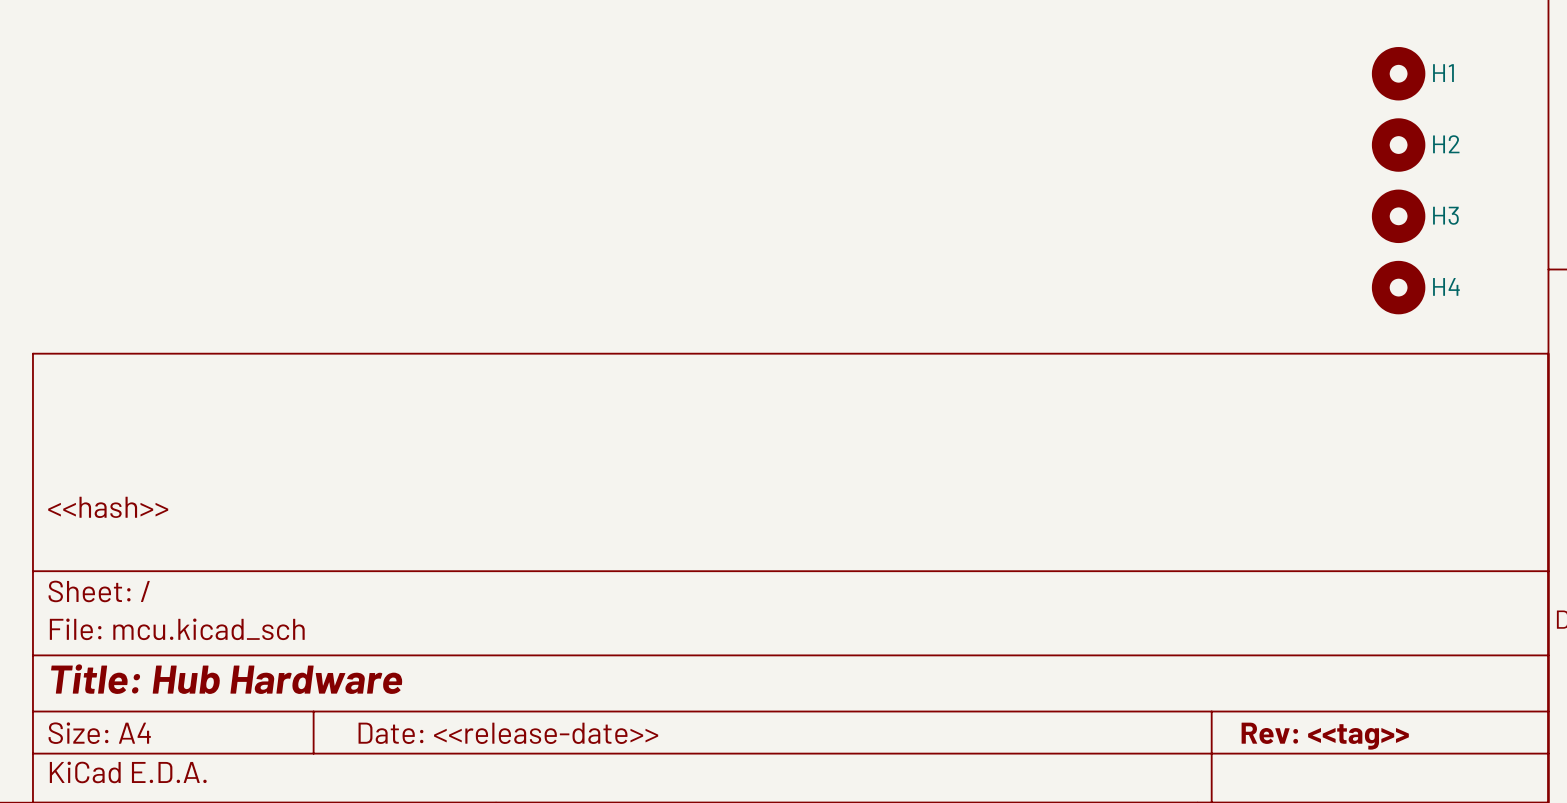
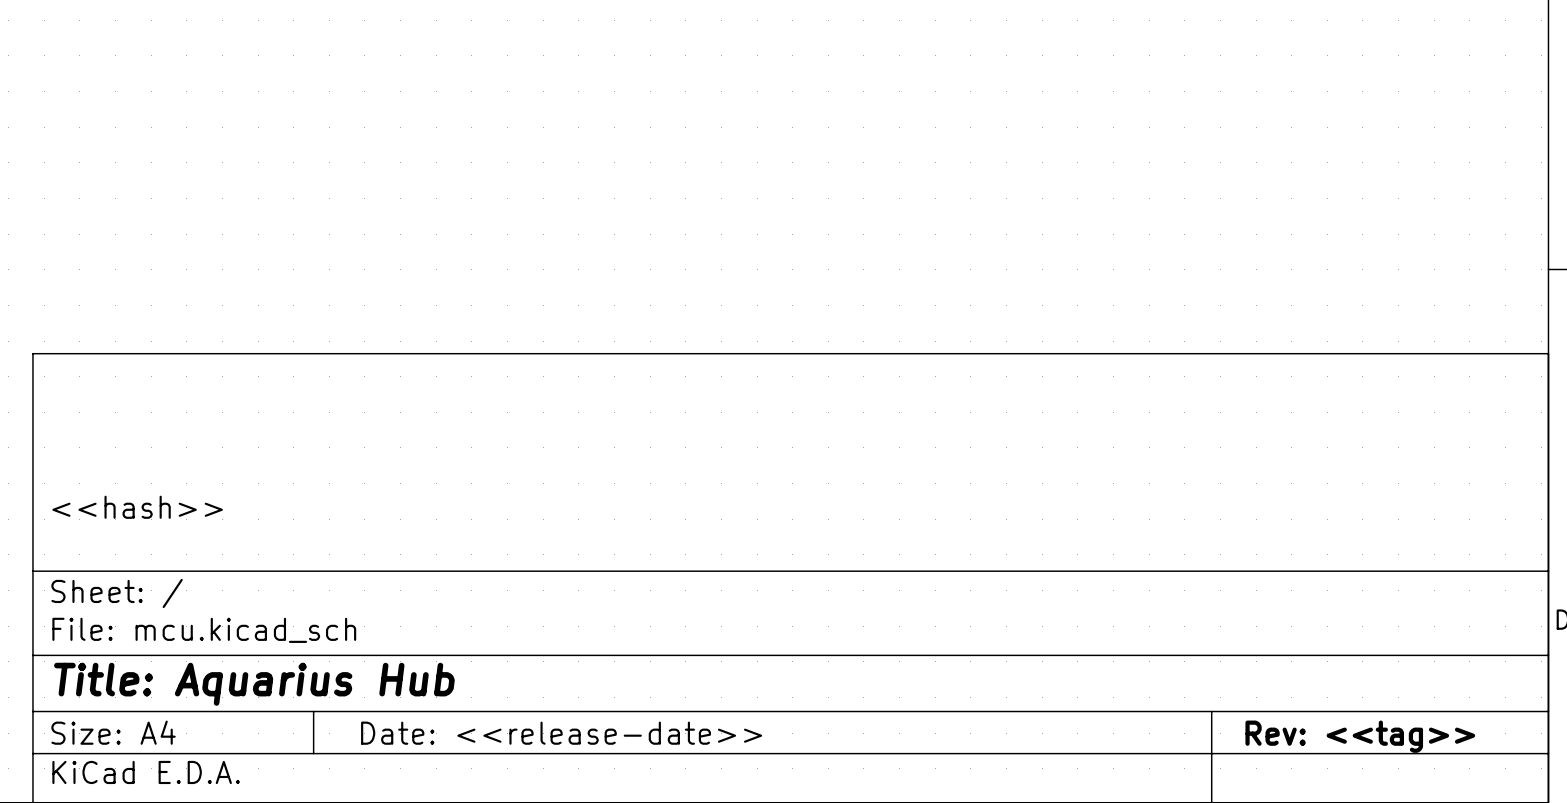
H1: (1398, 73) -> none
H2: (1398, 145) -> none
H3: (1398, 216) -> none
H4: (1398, 287) -> none
title block: Title: Hub Hardware (226, 679) -> Title: Aquarius Hub (254, 684)

